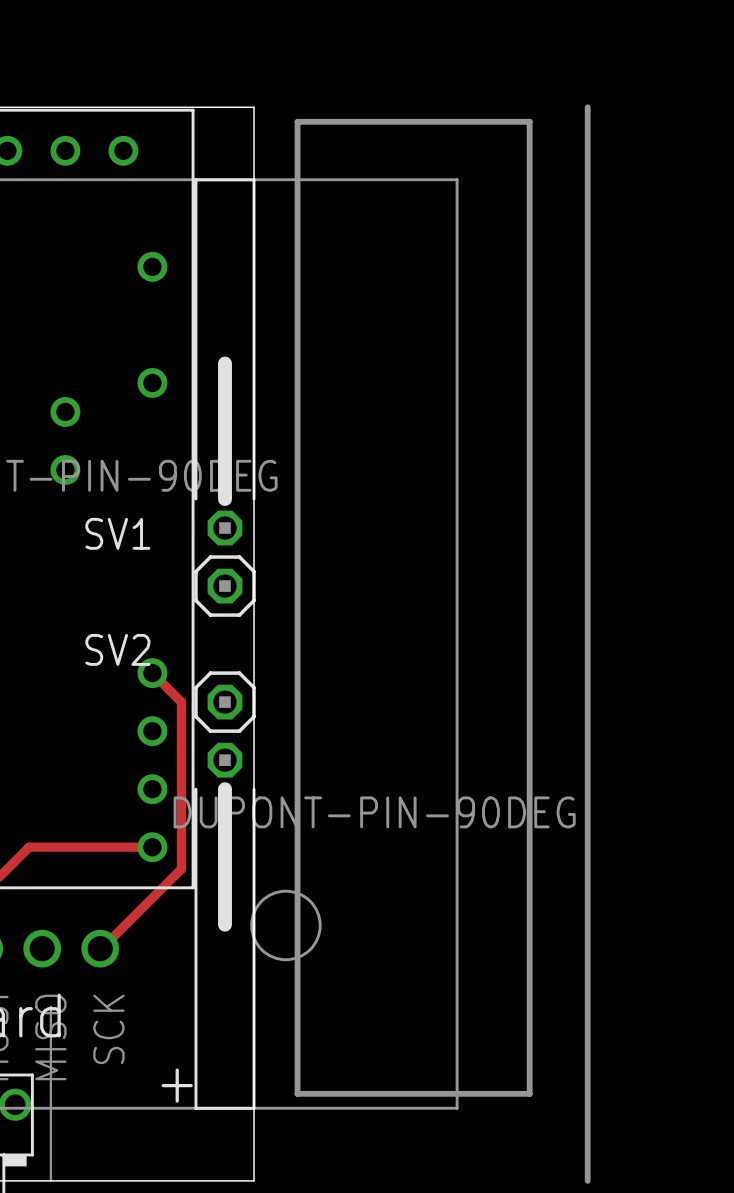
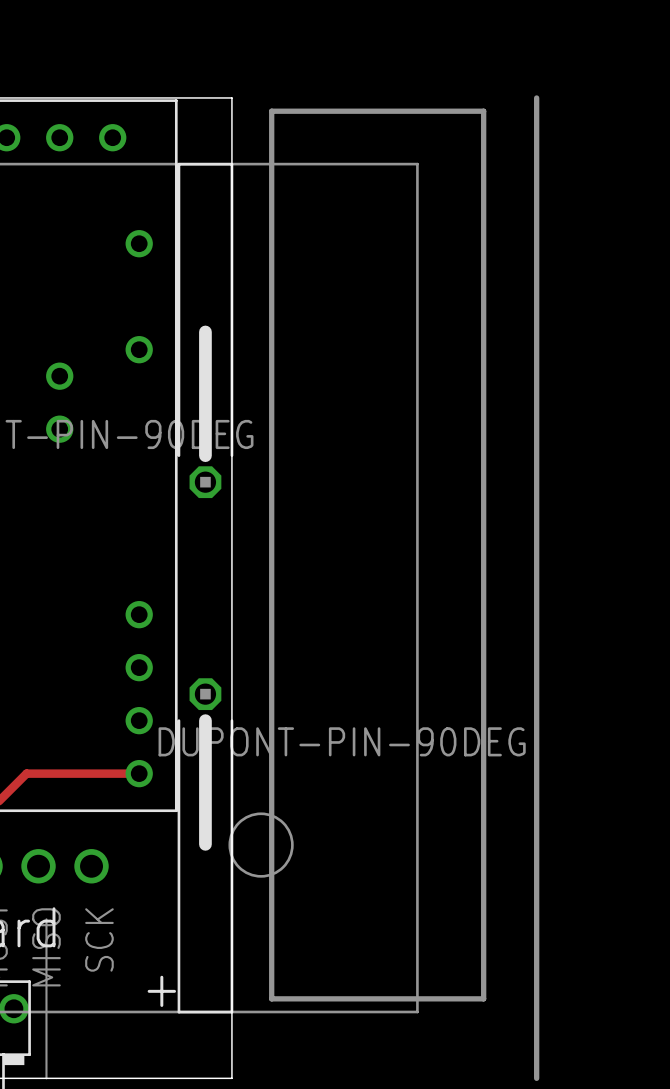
SV1: (224, 586) -> none
track: (152, 673) (181, 702) (181, 868) (100, 948) -> none
SV2: (224, 702) -> none

